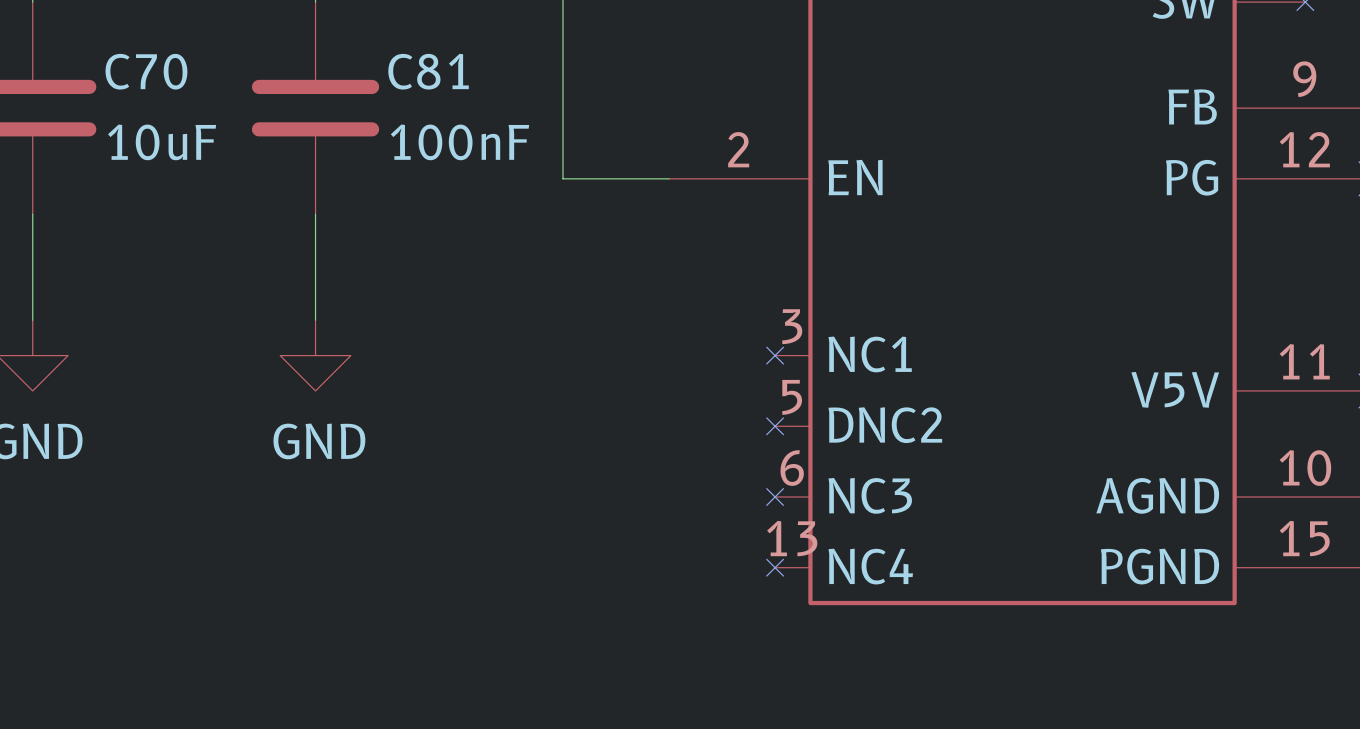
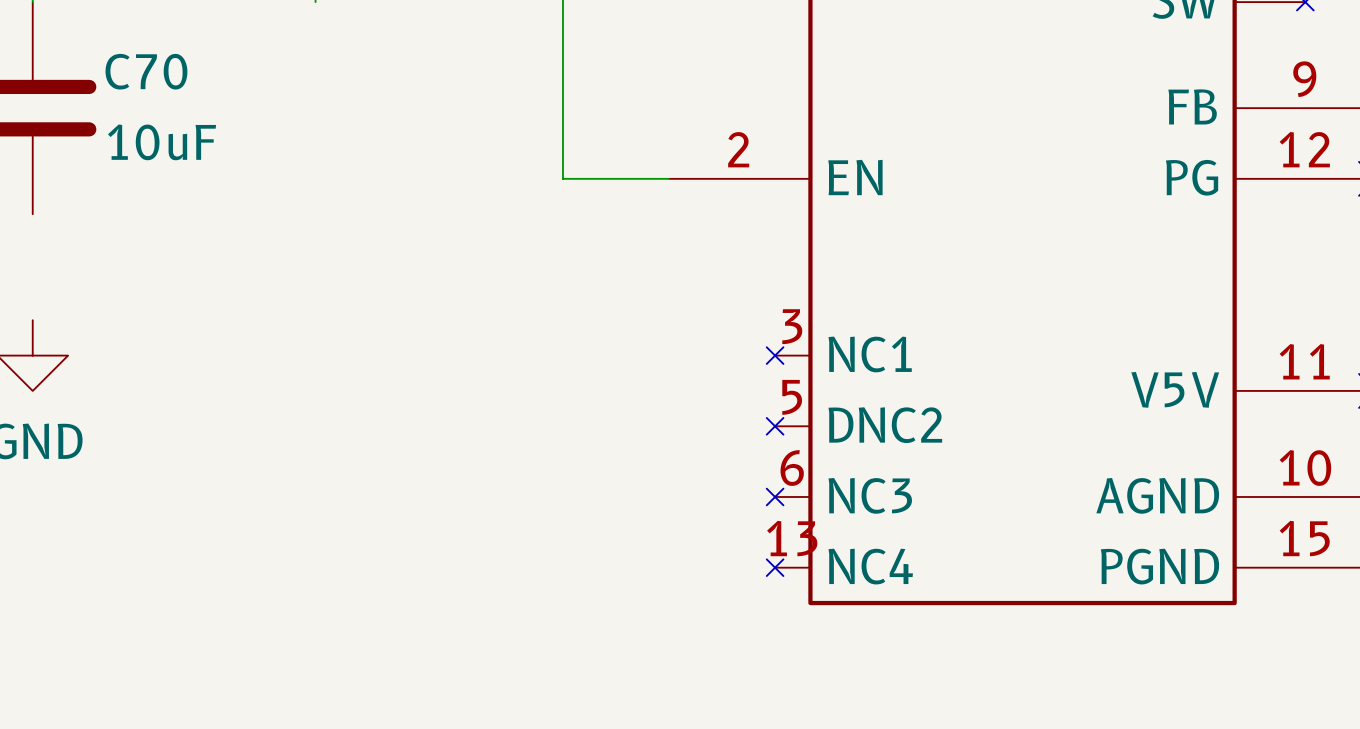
C81: 100nF (315, 108) -> none
wire: (32, 214) (32, 320) -> none
wire: (315, 214) (315, 320) -> none
power symbol: GND (315, 355) -> none

